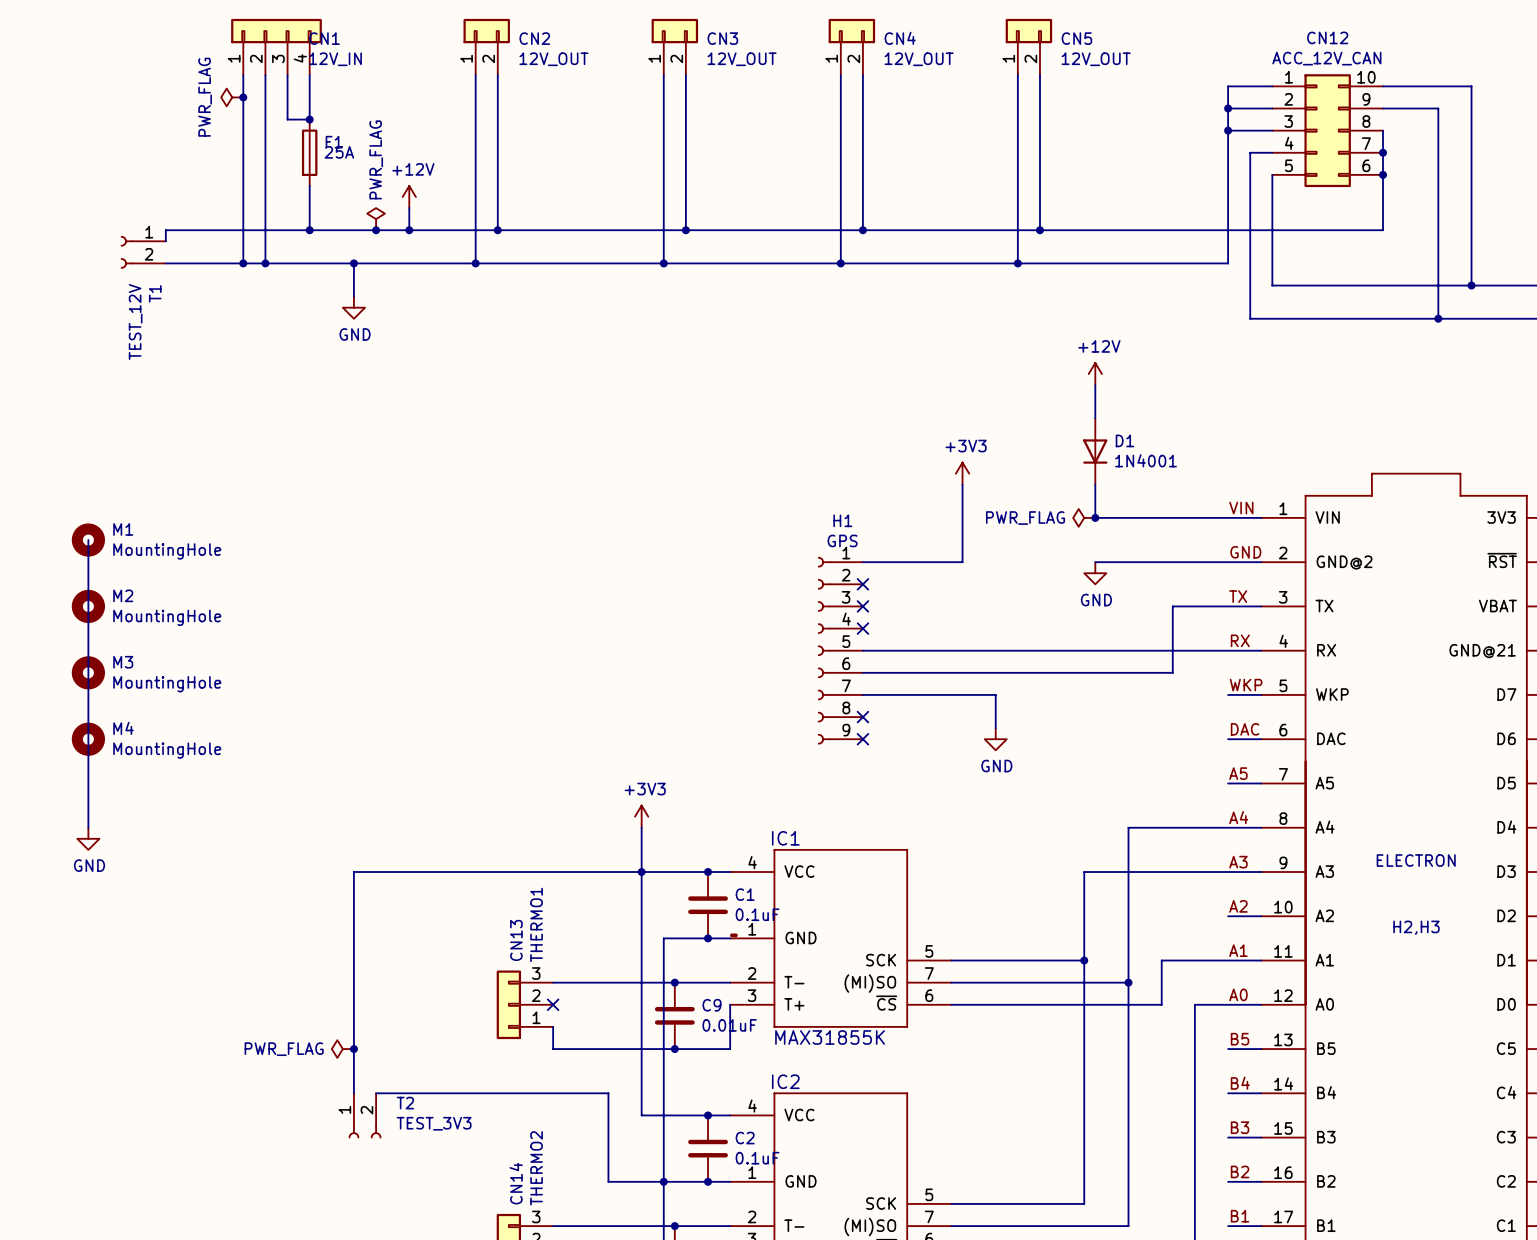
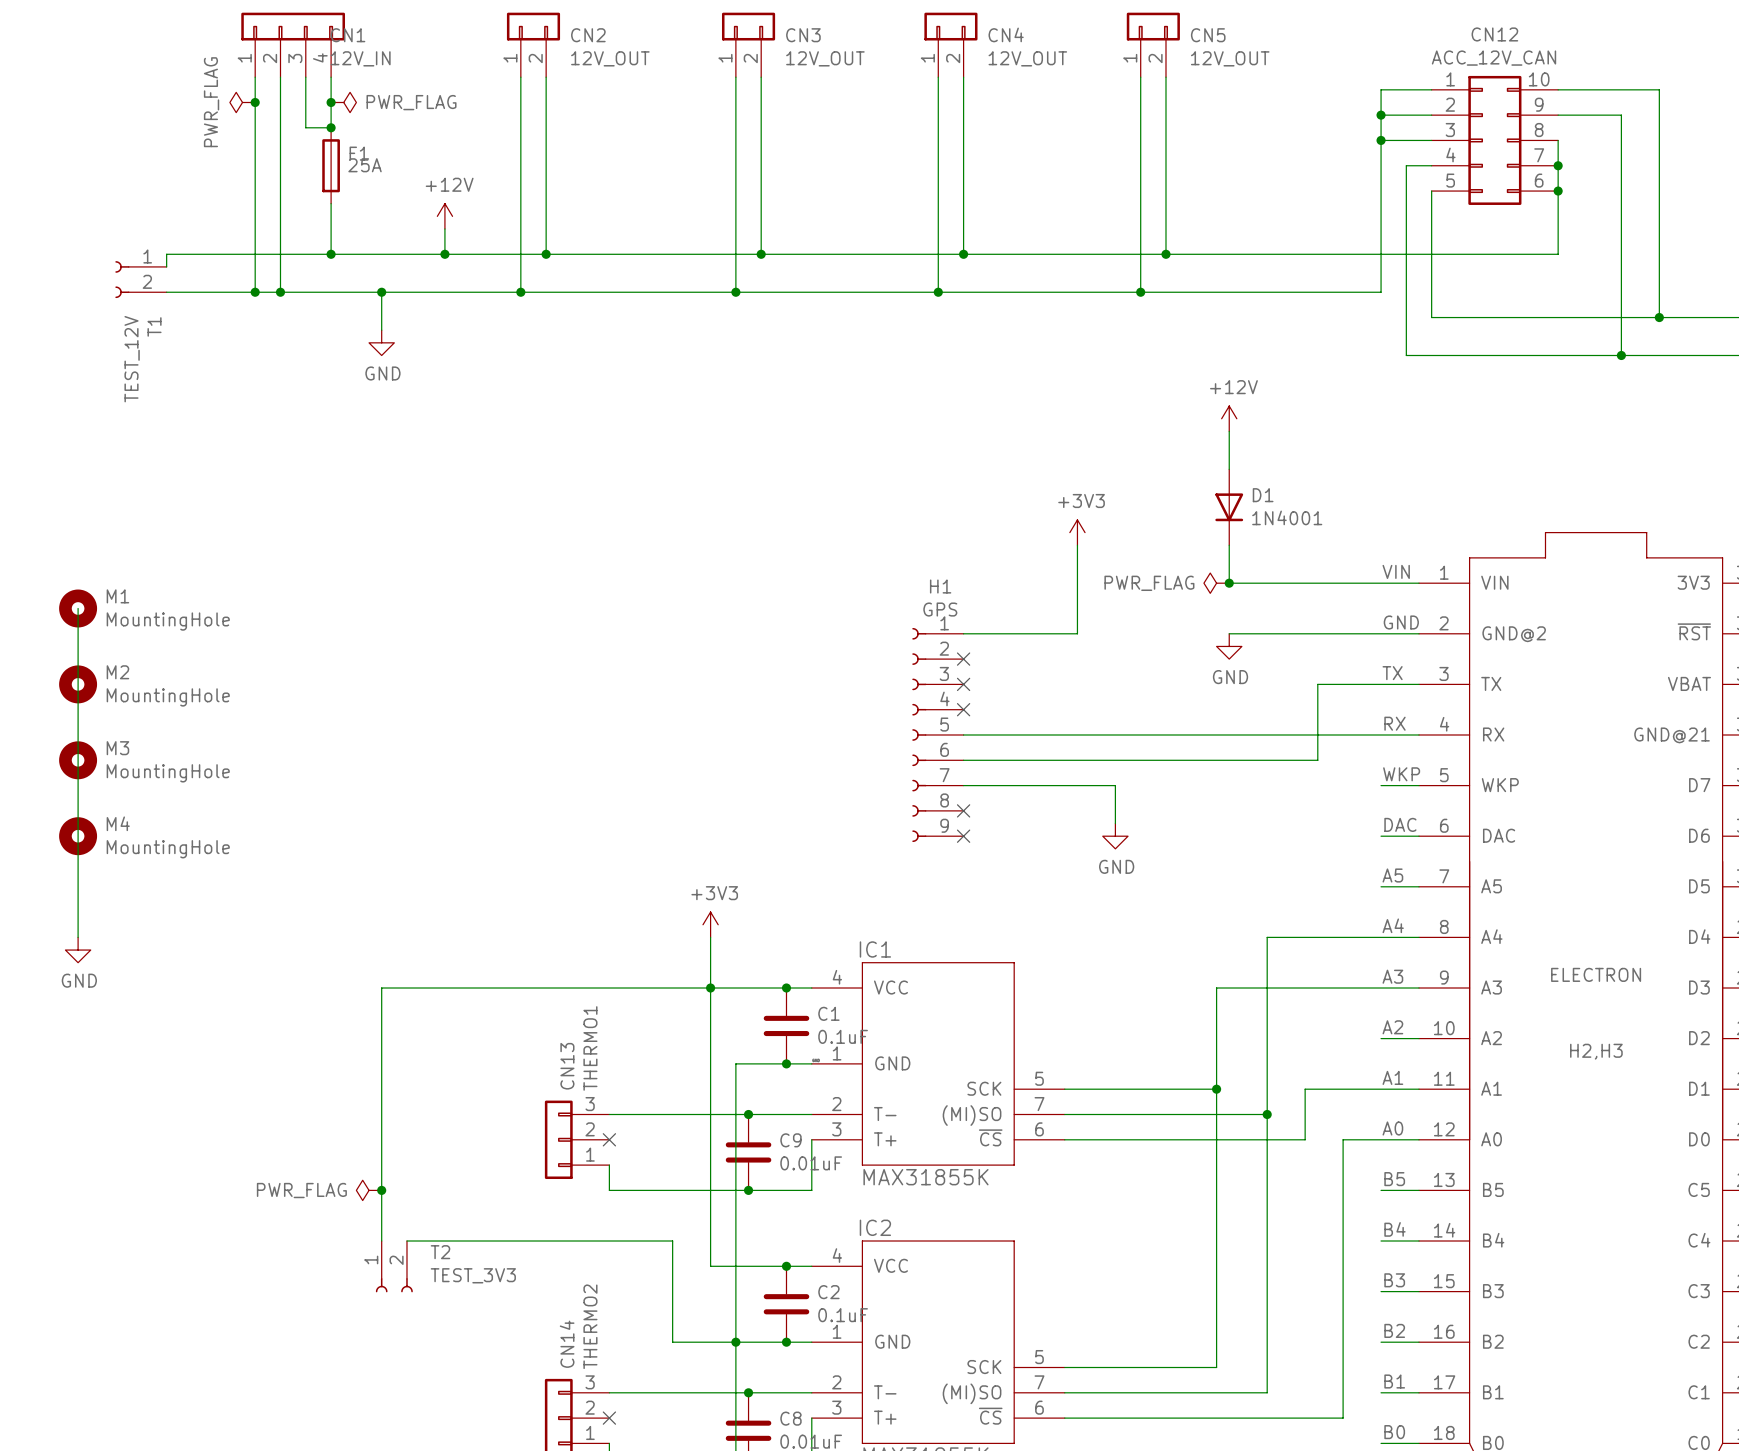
junction: none -> (331, 102)
power symbol rotation: 0° (376, 219) -> 90° clockwise (343, 102)
power symbol position: PWR_FLAG (376, 219) -> PWR_FLAG (343, 102)
junction: (376, 230) -> none

